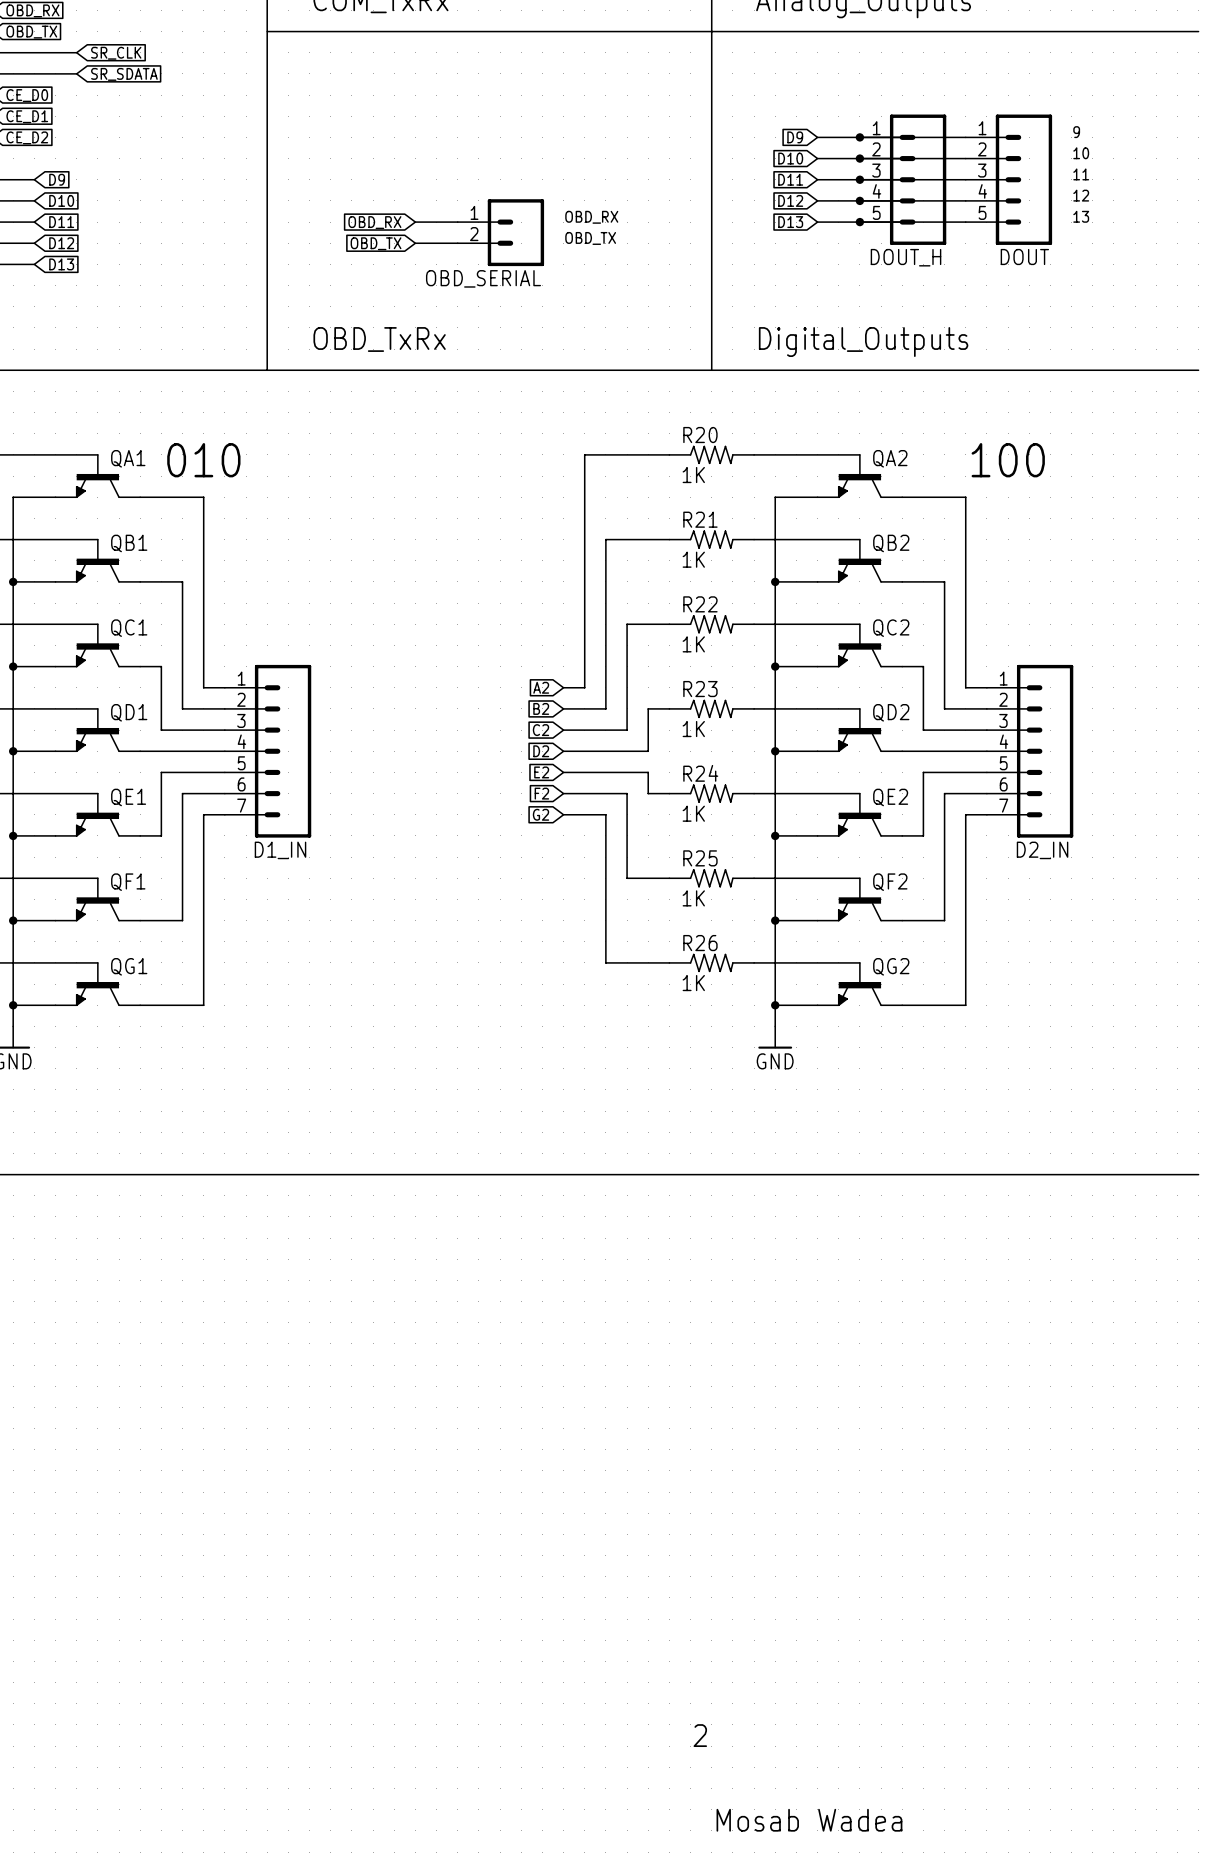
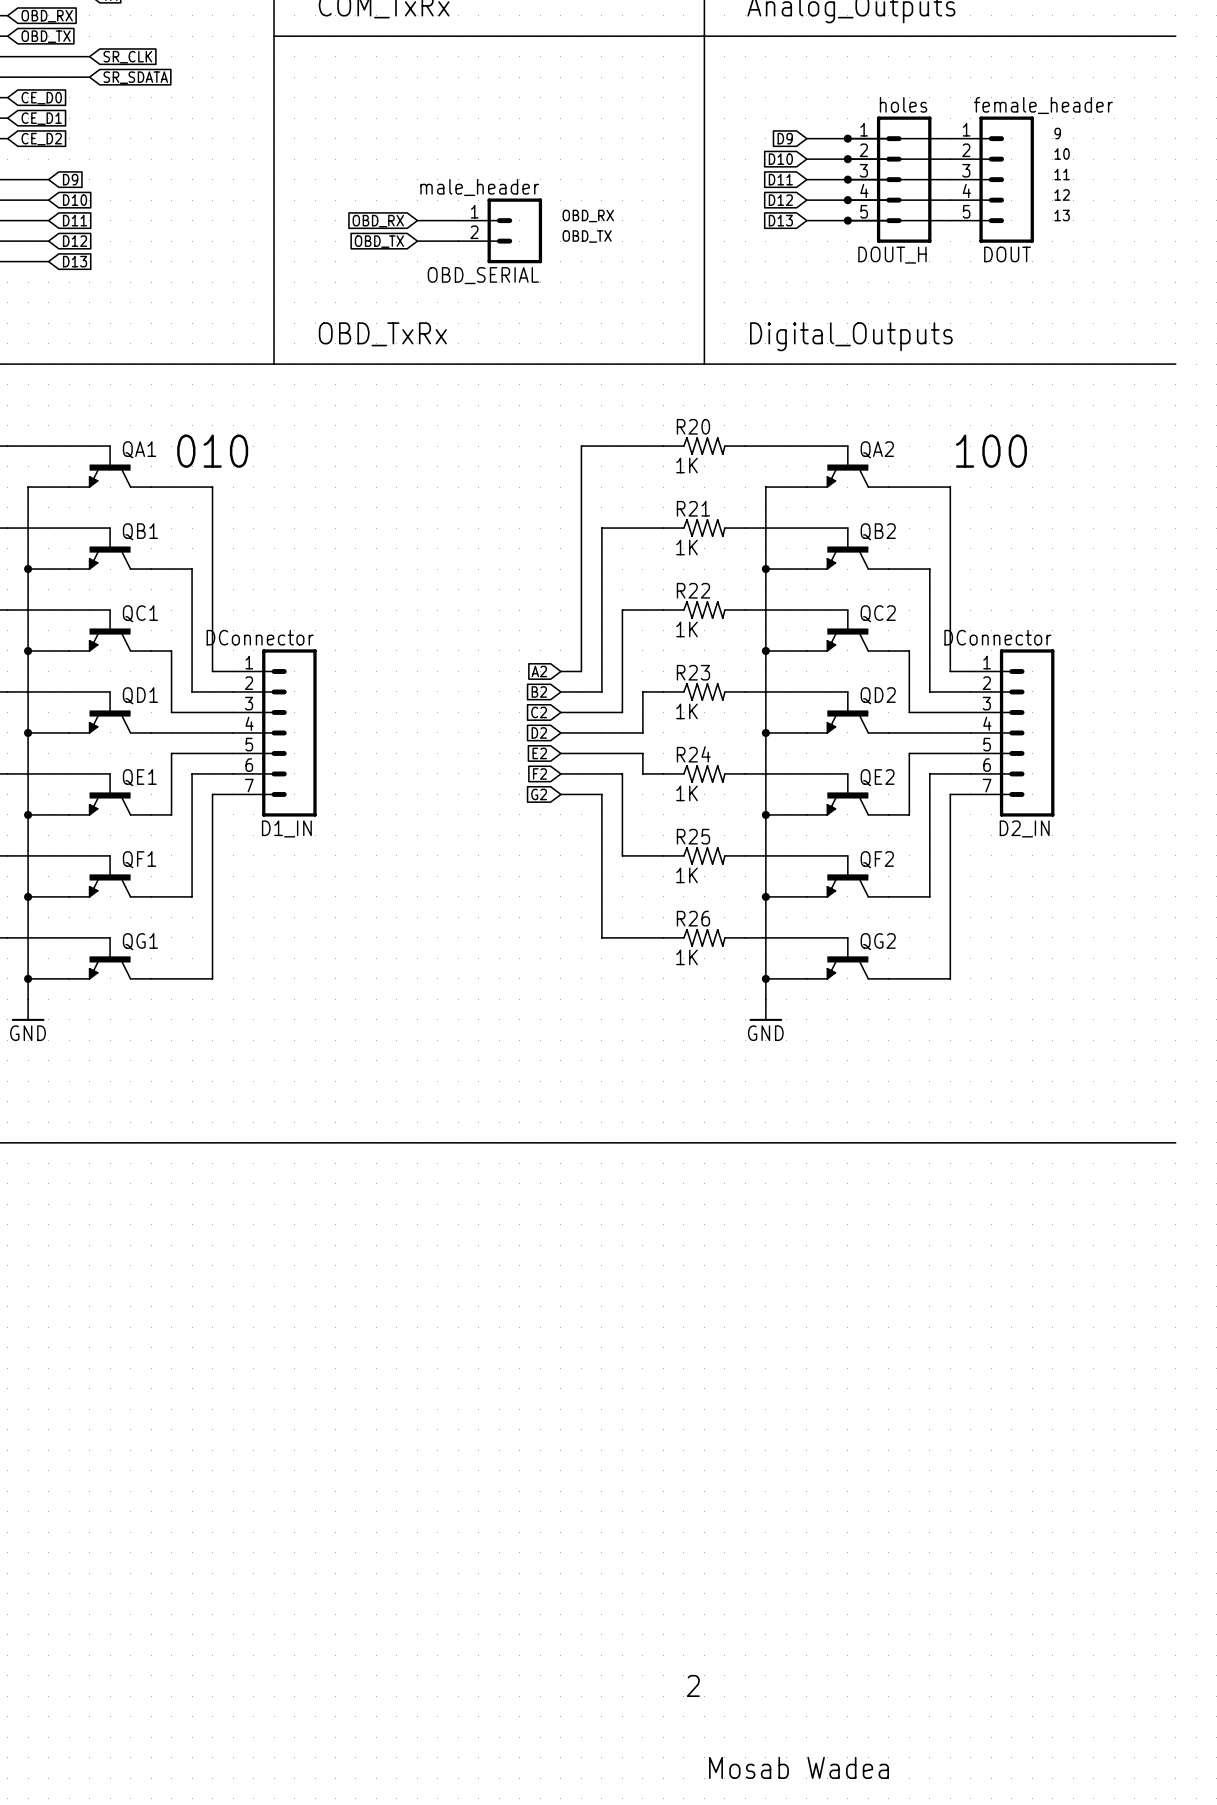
DOUT_H value: none -> holes (903, 104)
DOUT value: none -> female_header (1043, 105)
OBD_SERIAL value: none -> male_header (479, 187)
D1_IN value: none -> DConnector (260, 637)
D2_IN value: none -> DConnector (997, 637)

